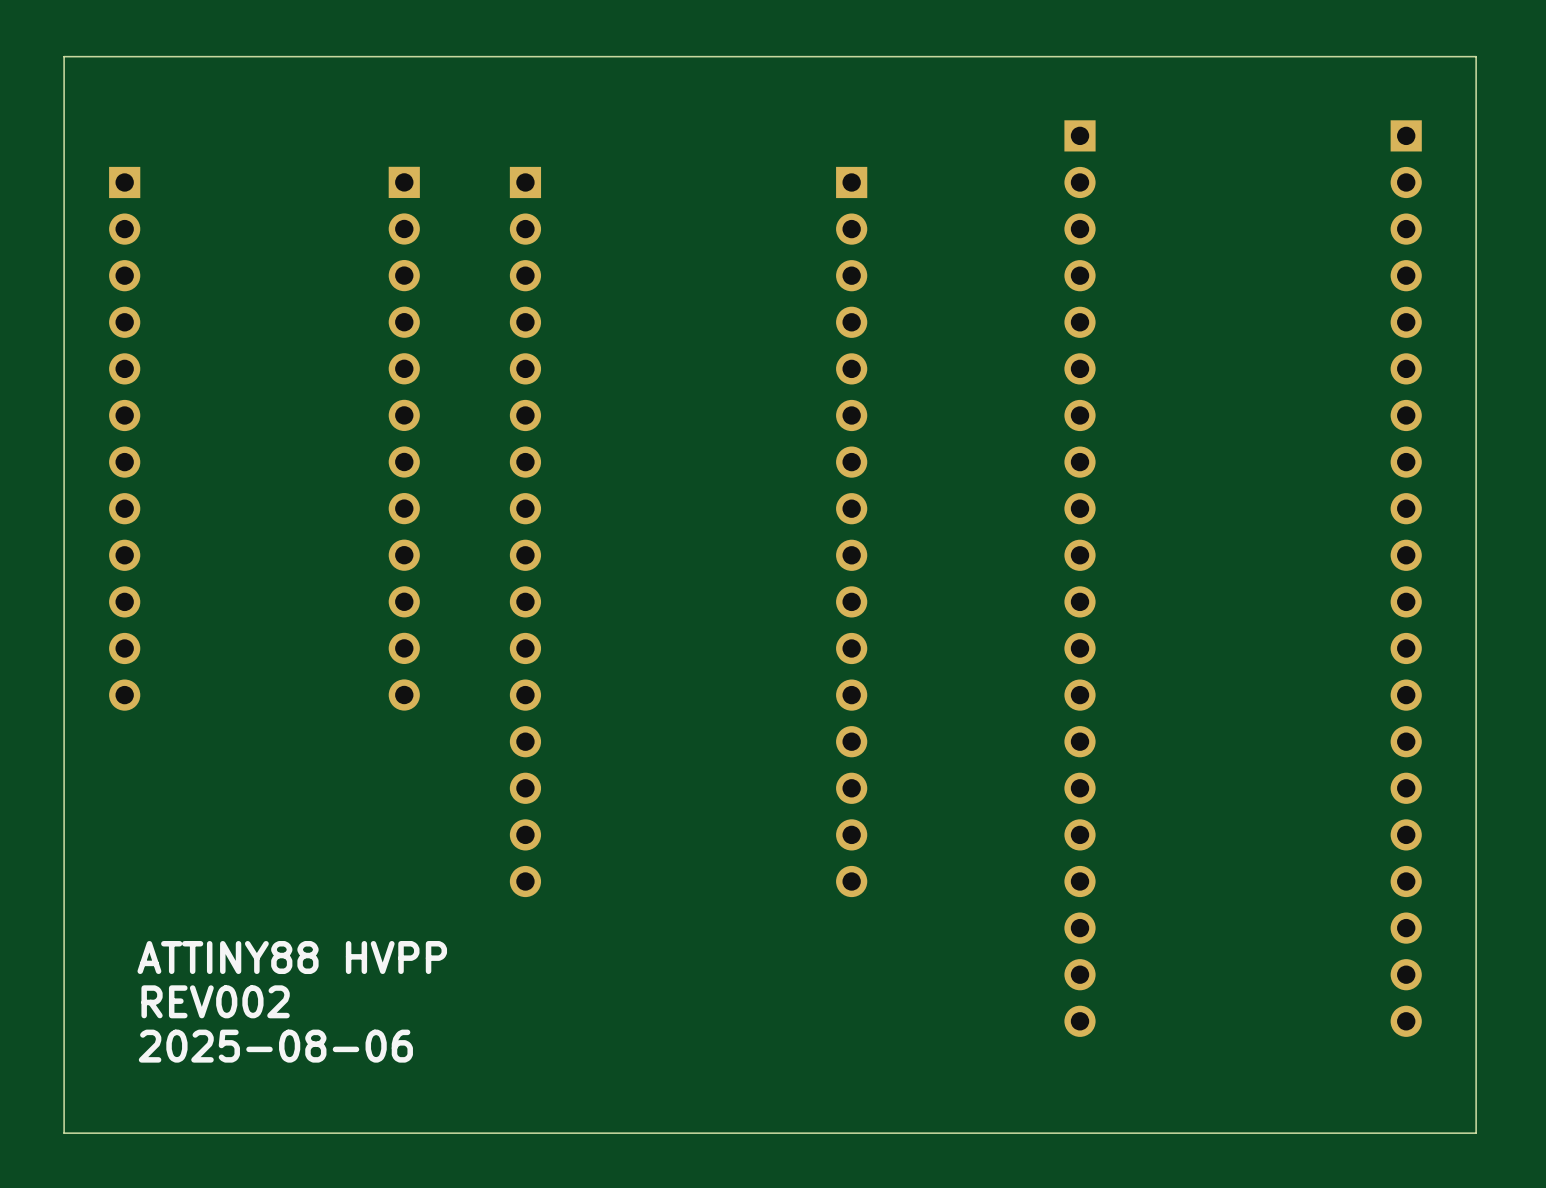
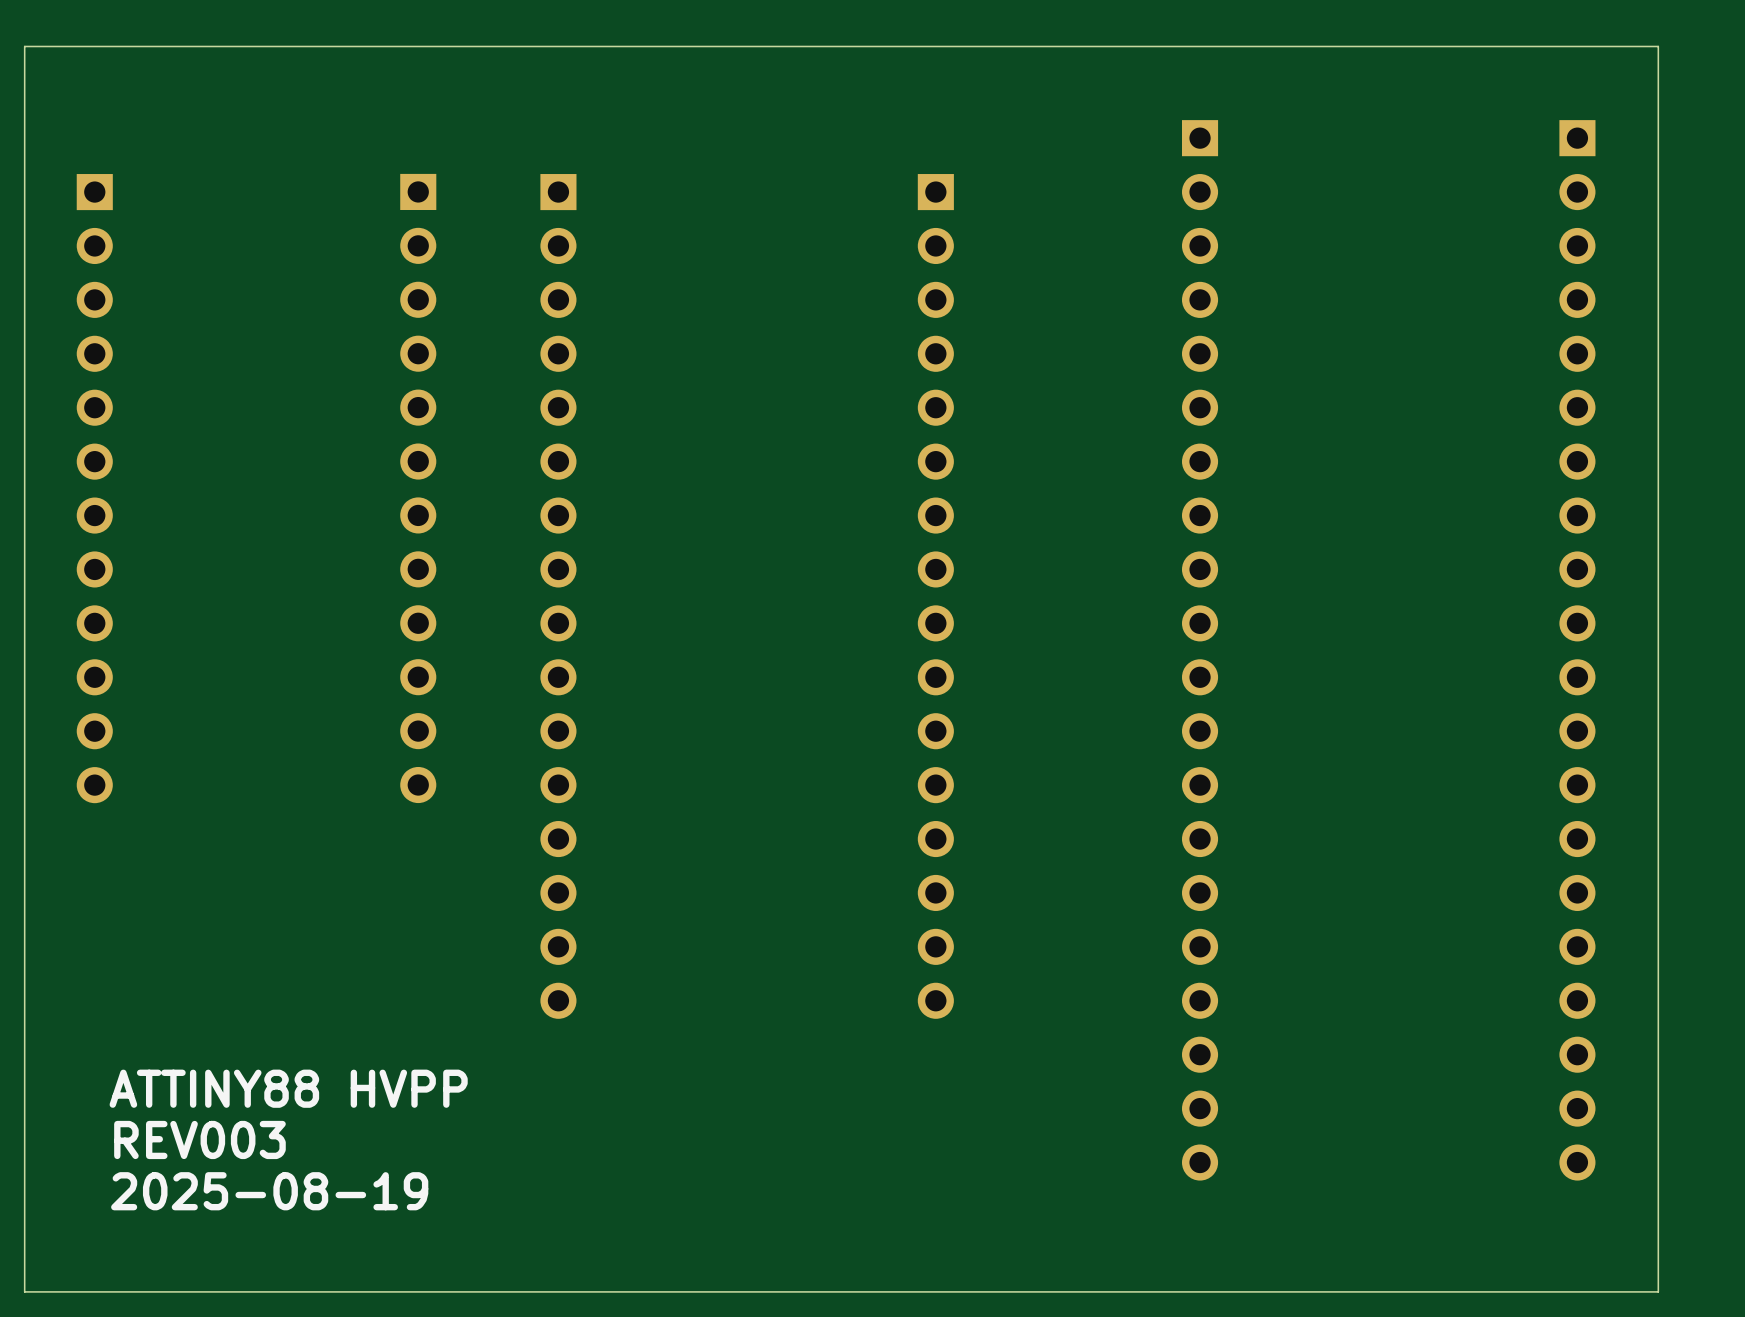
text: REV002 (215, 1001) -> REV003 (199, 1139)
text: 2025-08-06 (275, 1046) -> 2025-08-19 (269, 1191)

